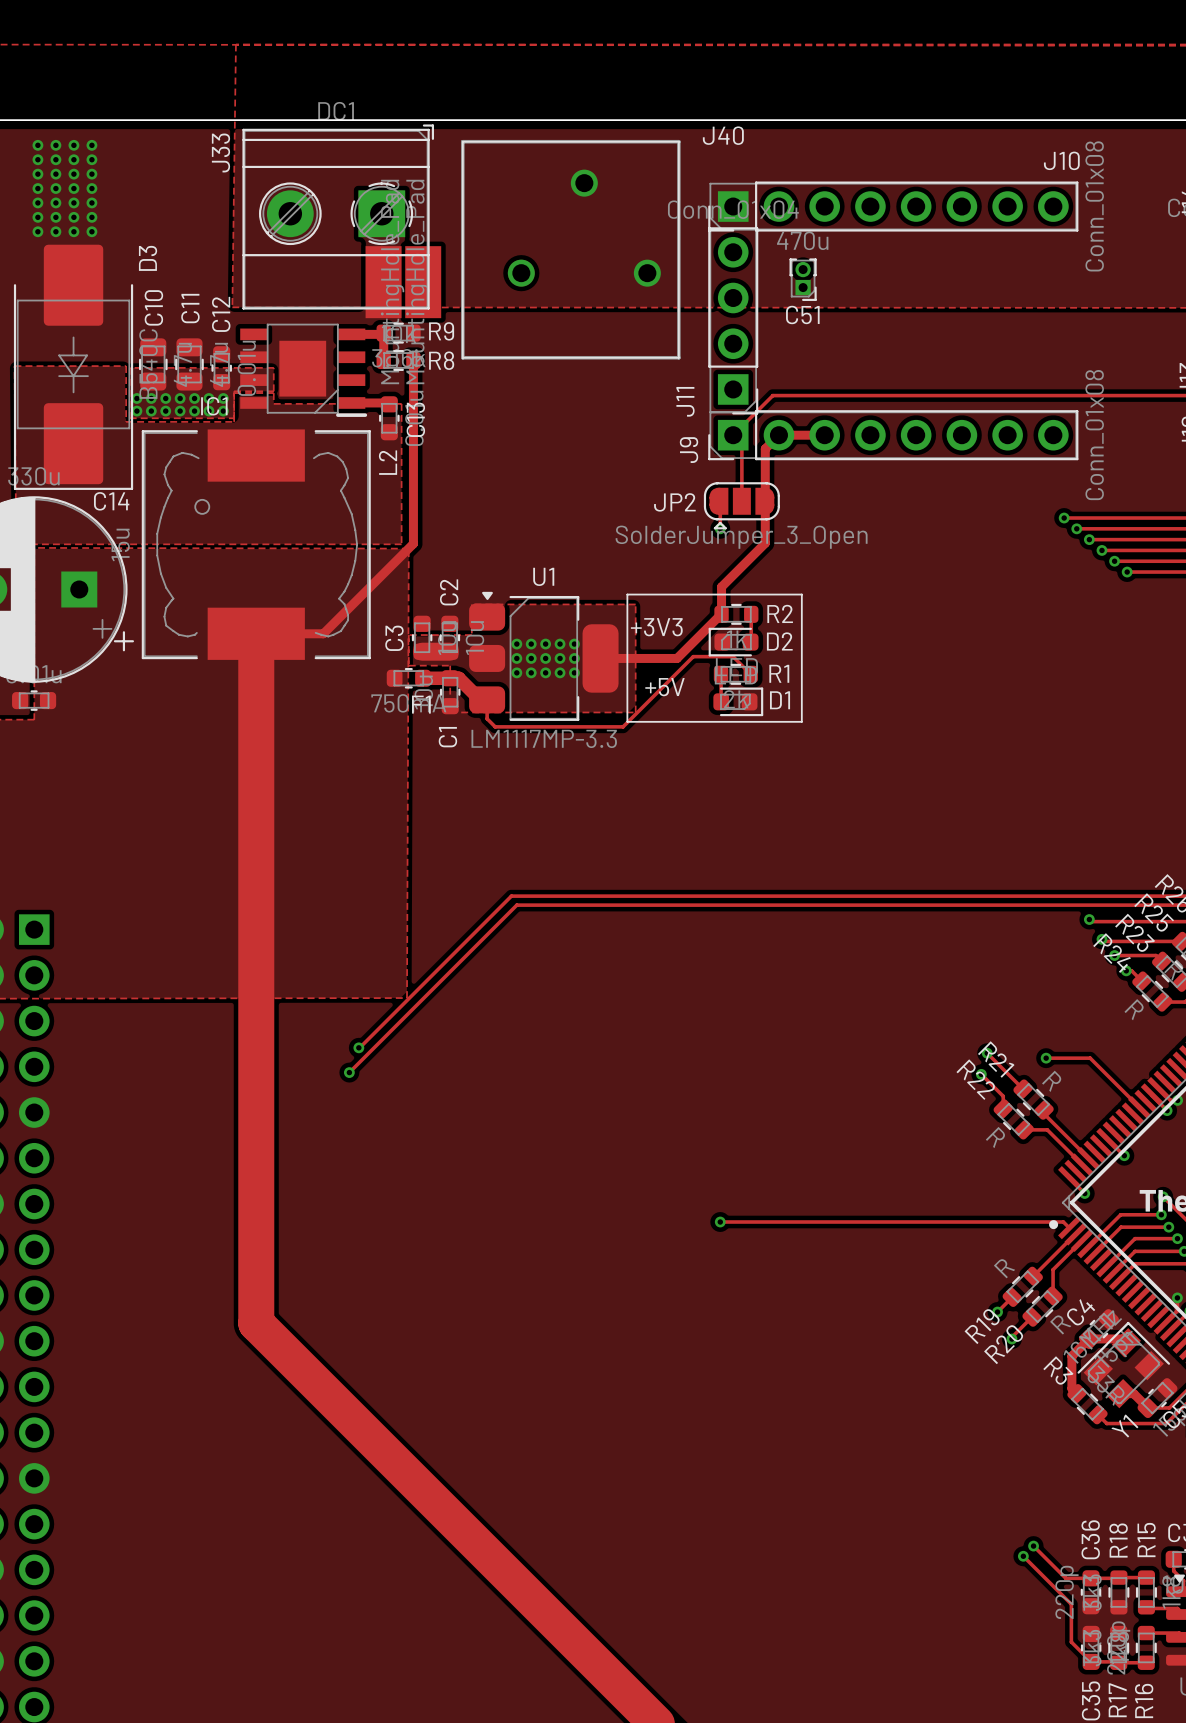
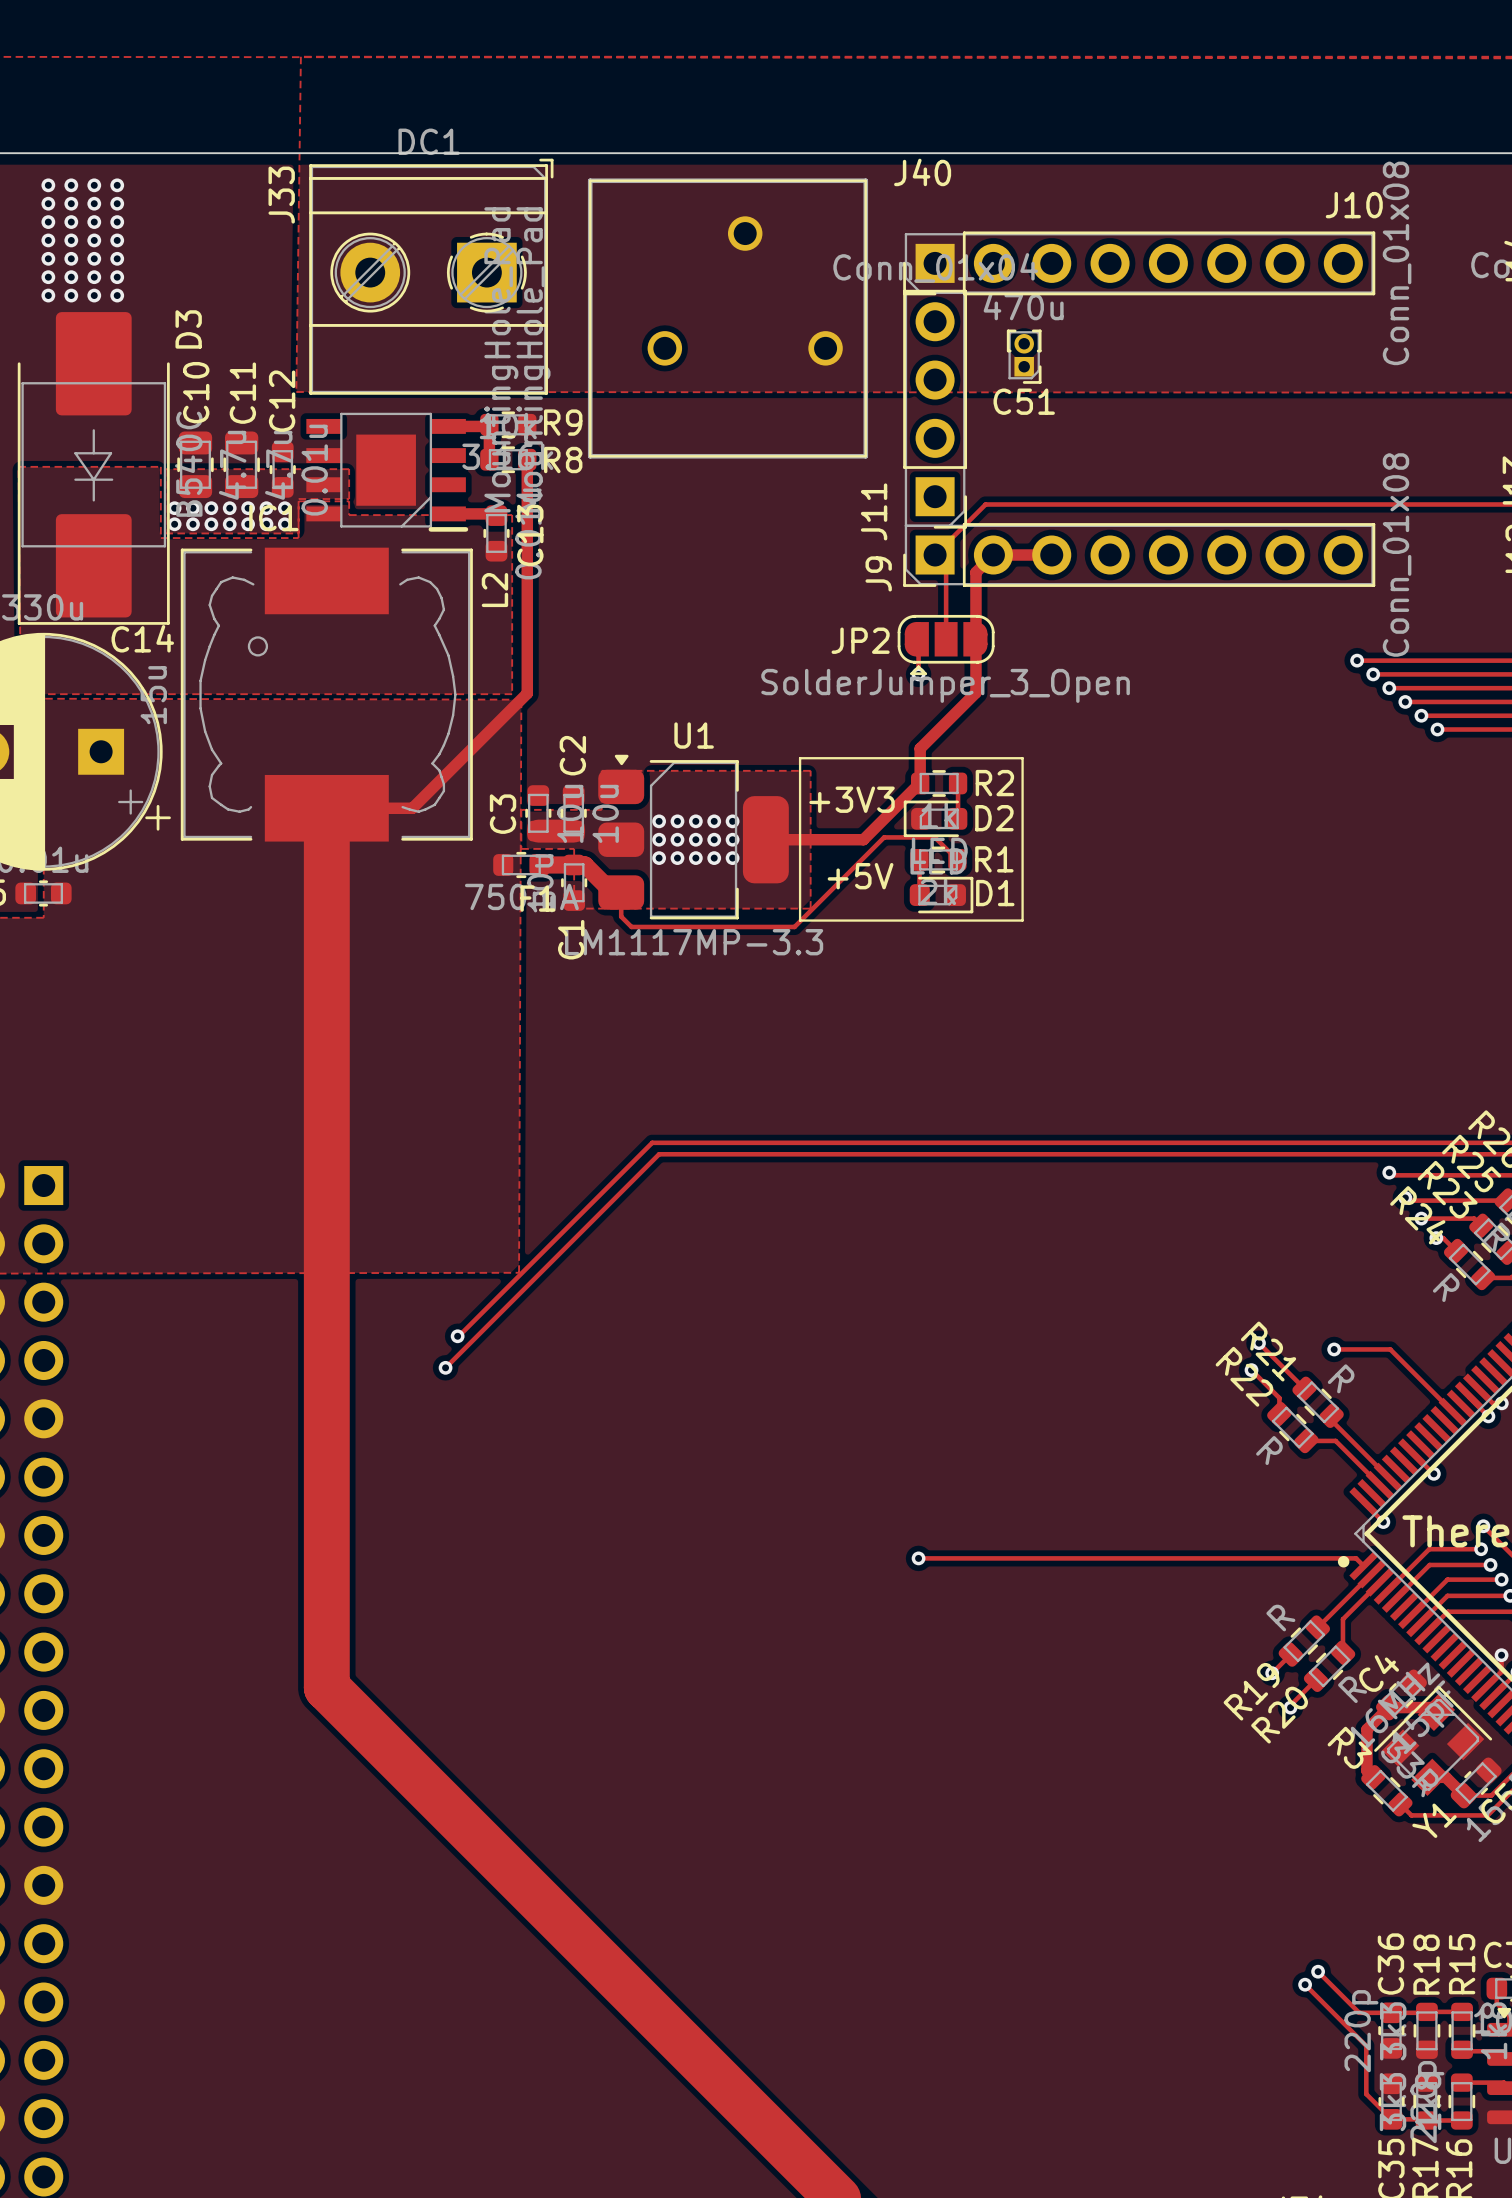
part footprint: [365, 246, 402, 319] -> [484, 207, 519, 513]
part footprint: [405, 246, 442, 319] -> [516, 207, 551, 513]

